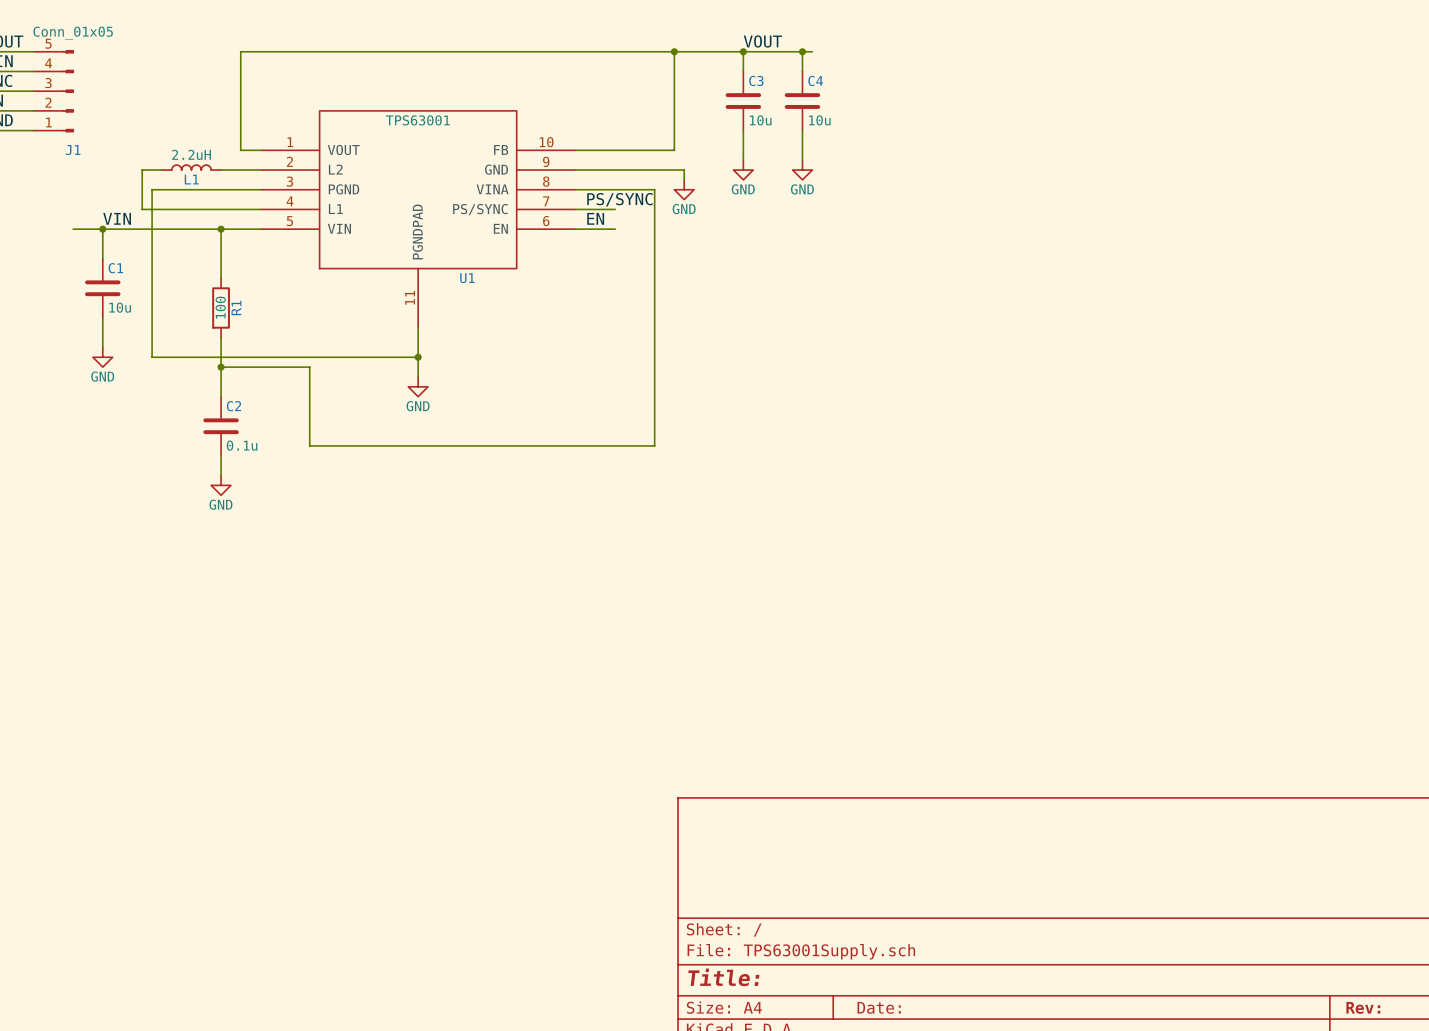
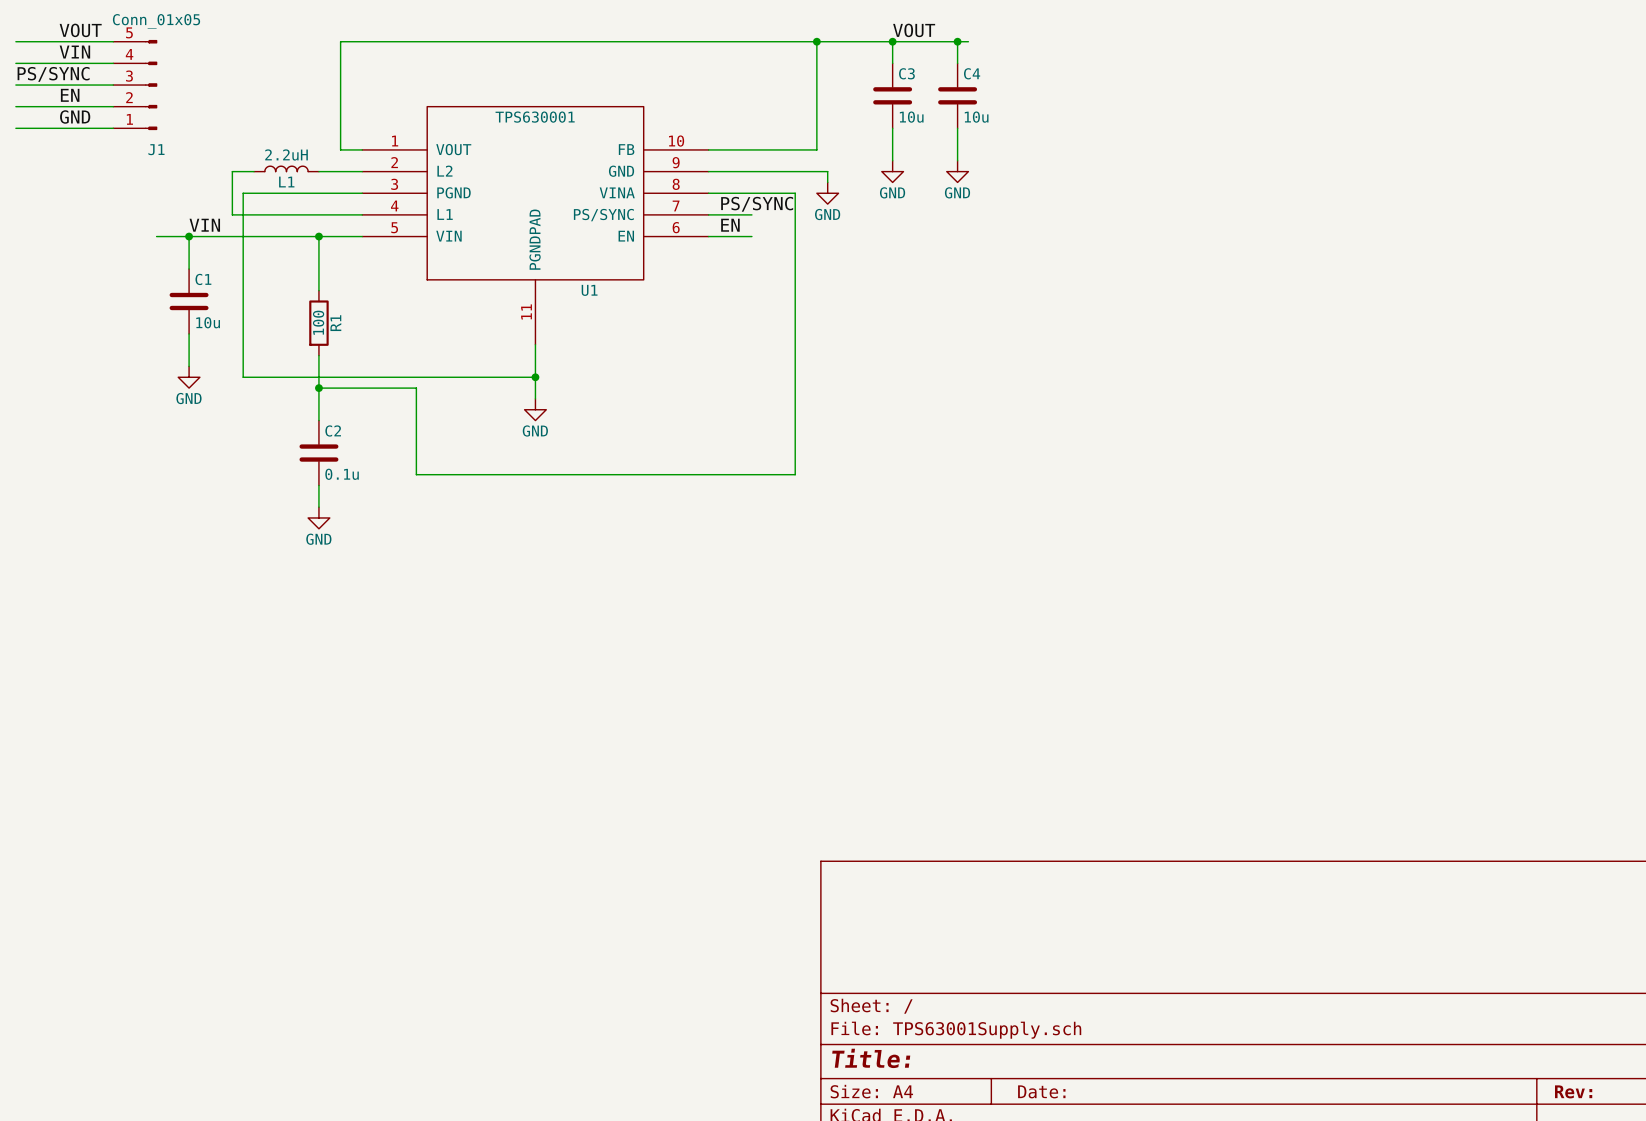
U1 value: TPS63001 (417, 120) -> TPS630001 (535, 117)

